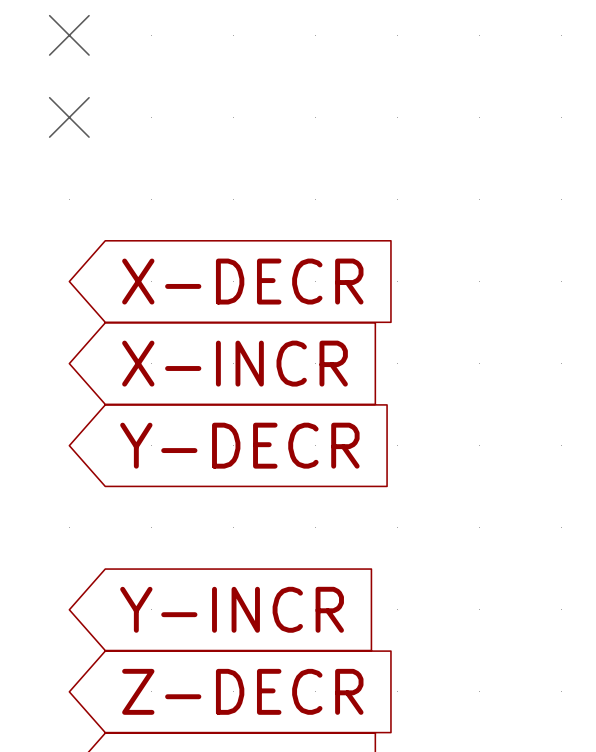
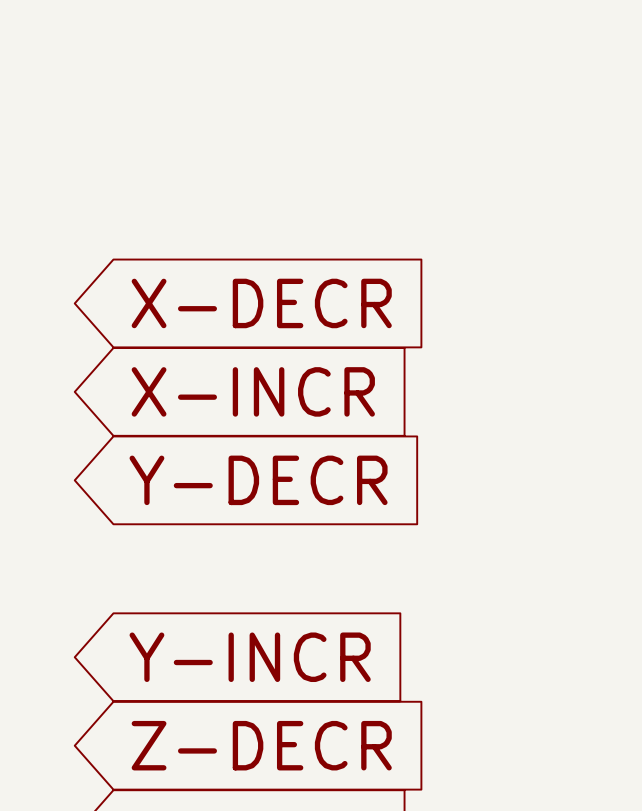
no-connect mark: (69, 35) -> none
no-connect mark: (69, 117) -> none

